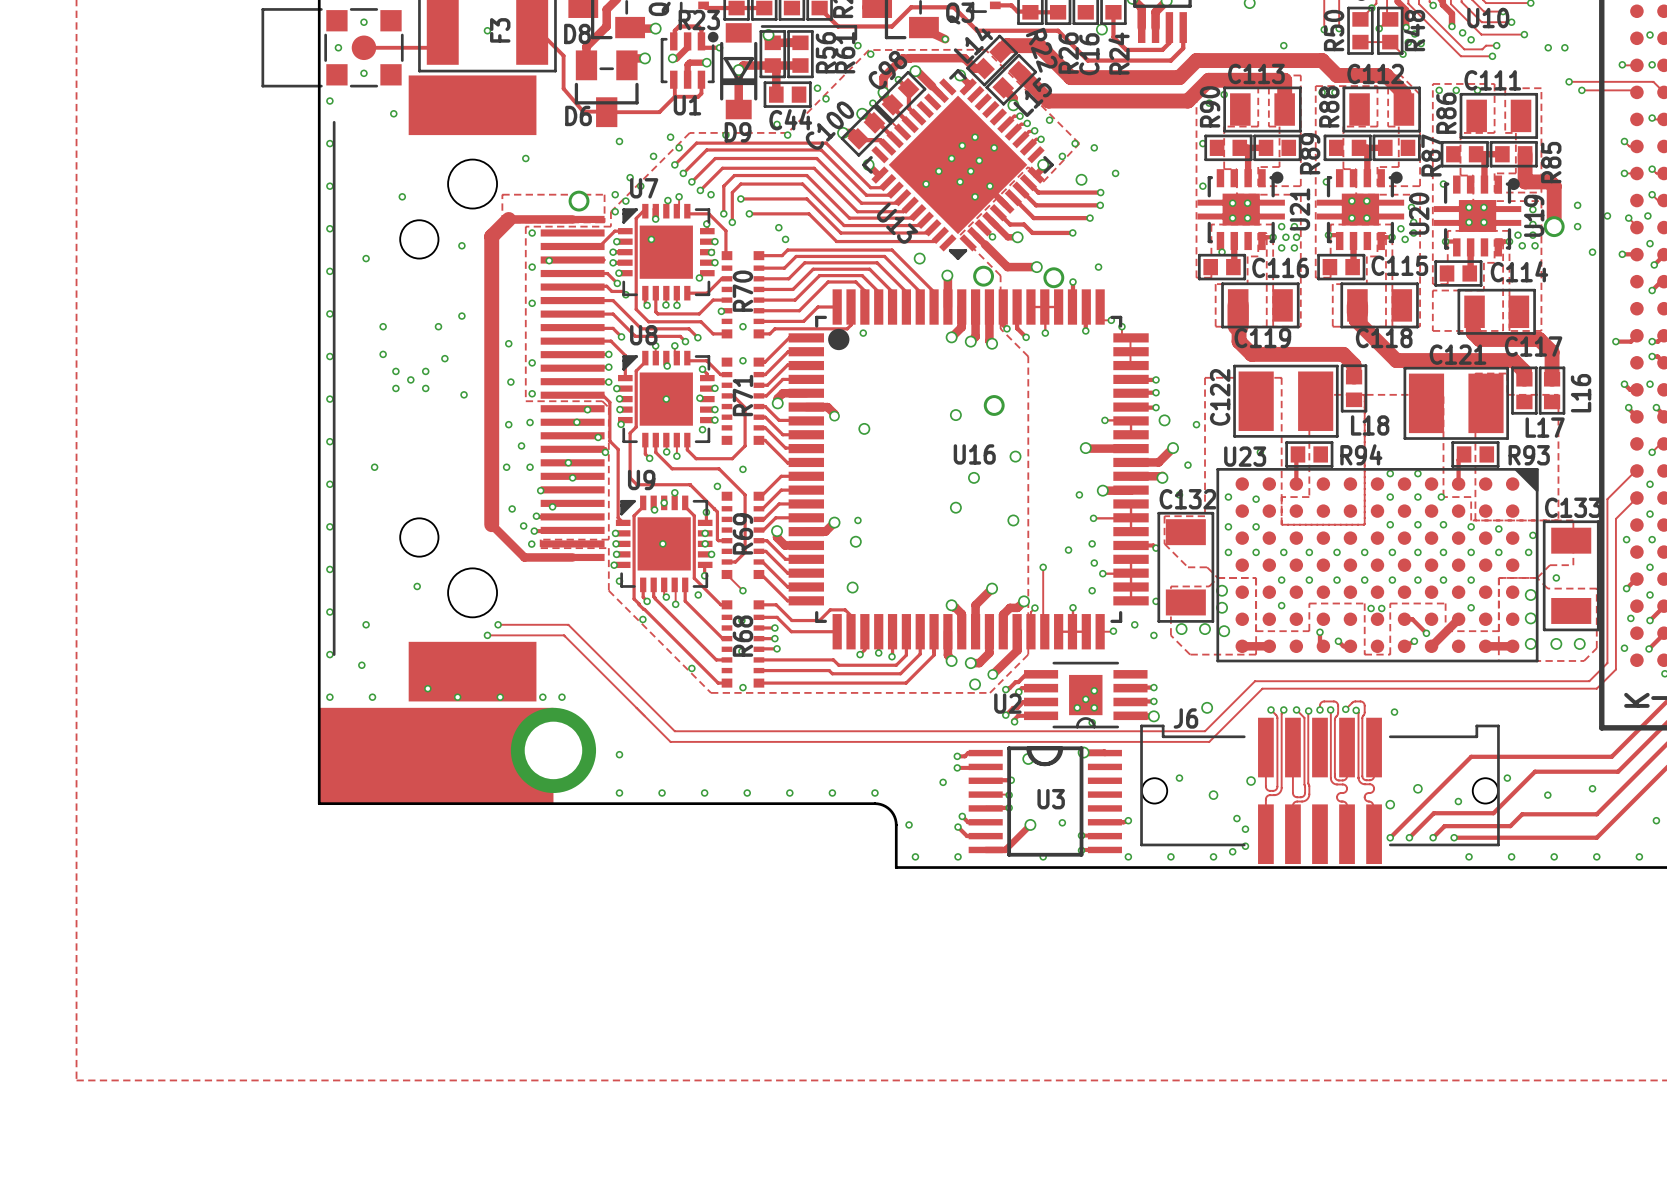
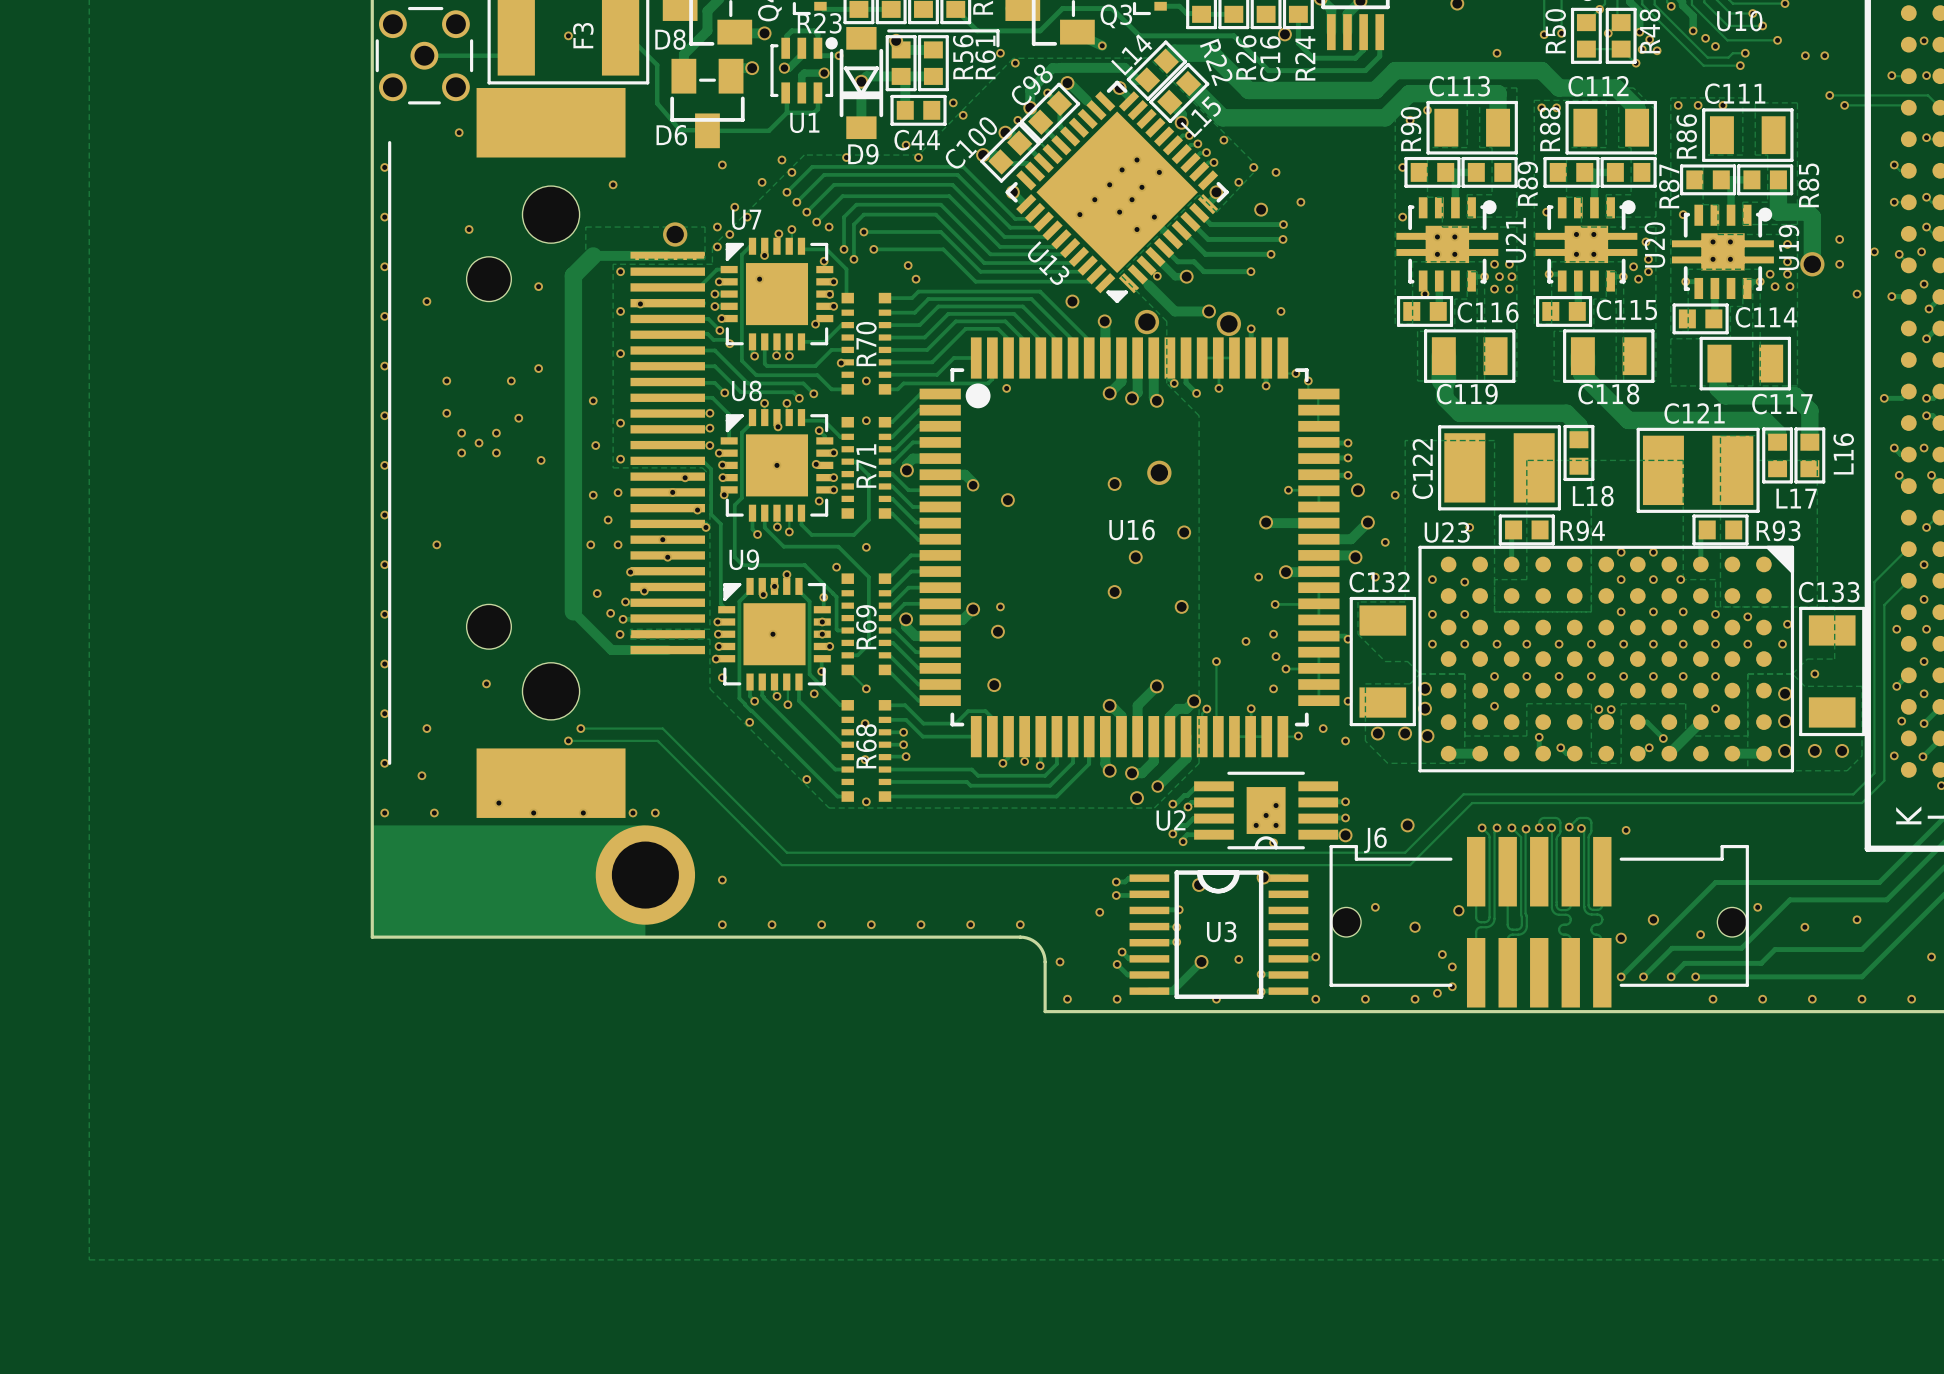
via: (363, 22) -> none
part: (332, 47) -> none
via: (338, 47) -> none
part: none -> (424, 55)
via: (363, 73) -> none
via: (329, 101) -> none

